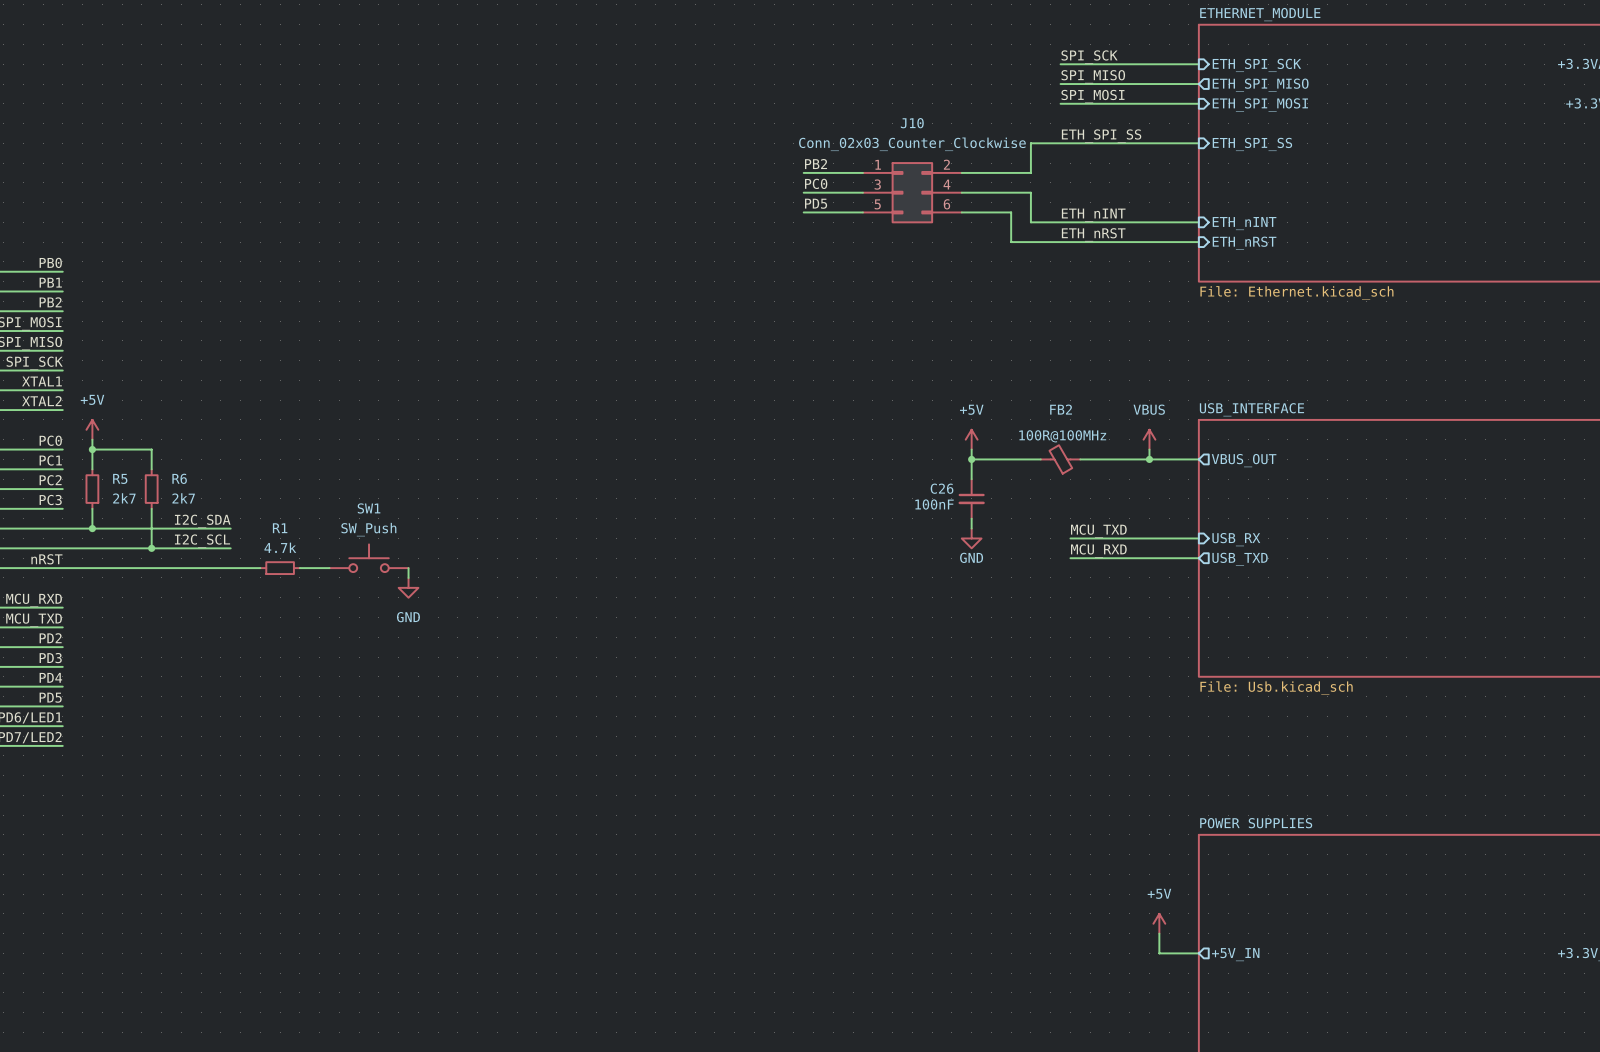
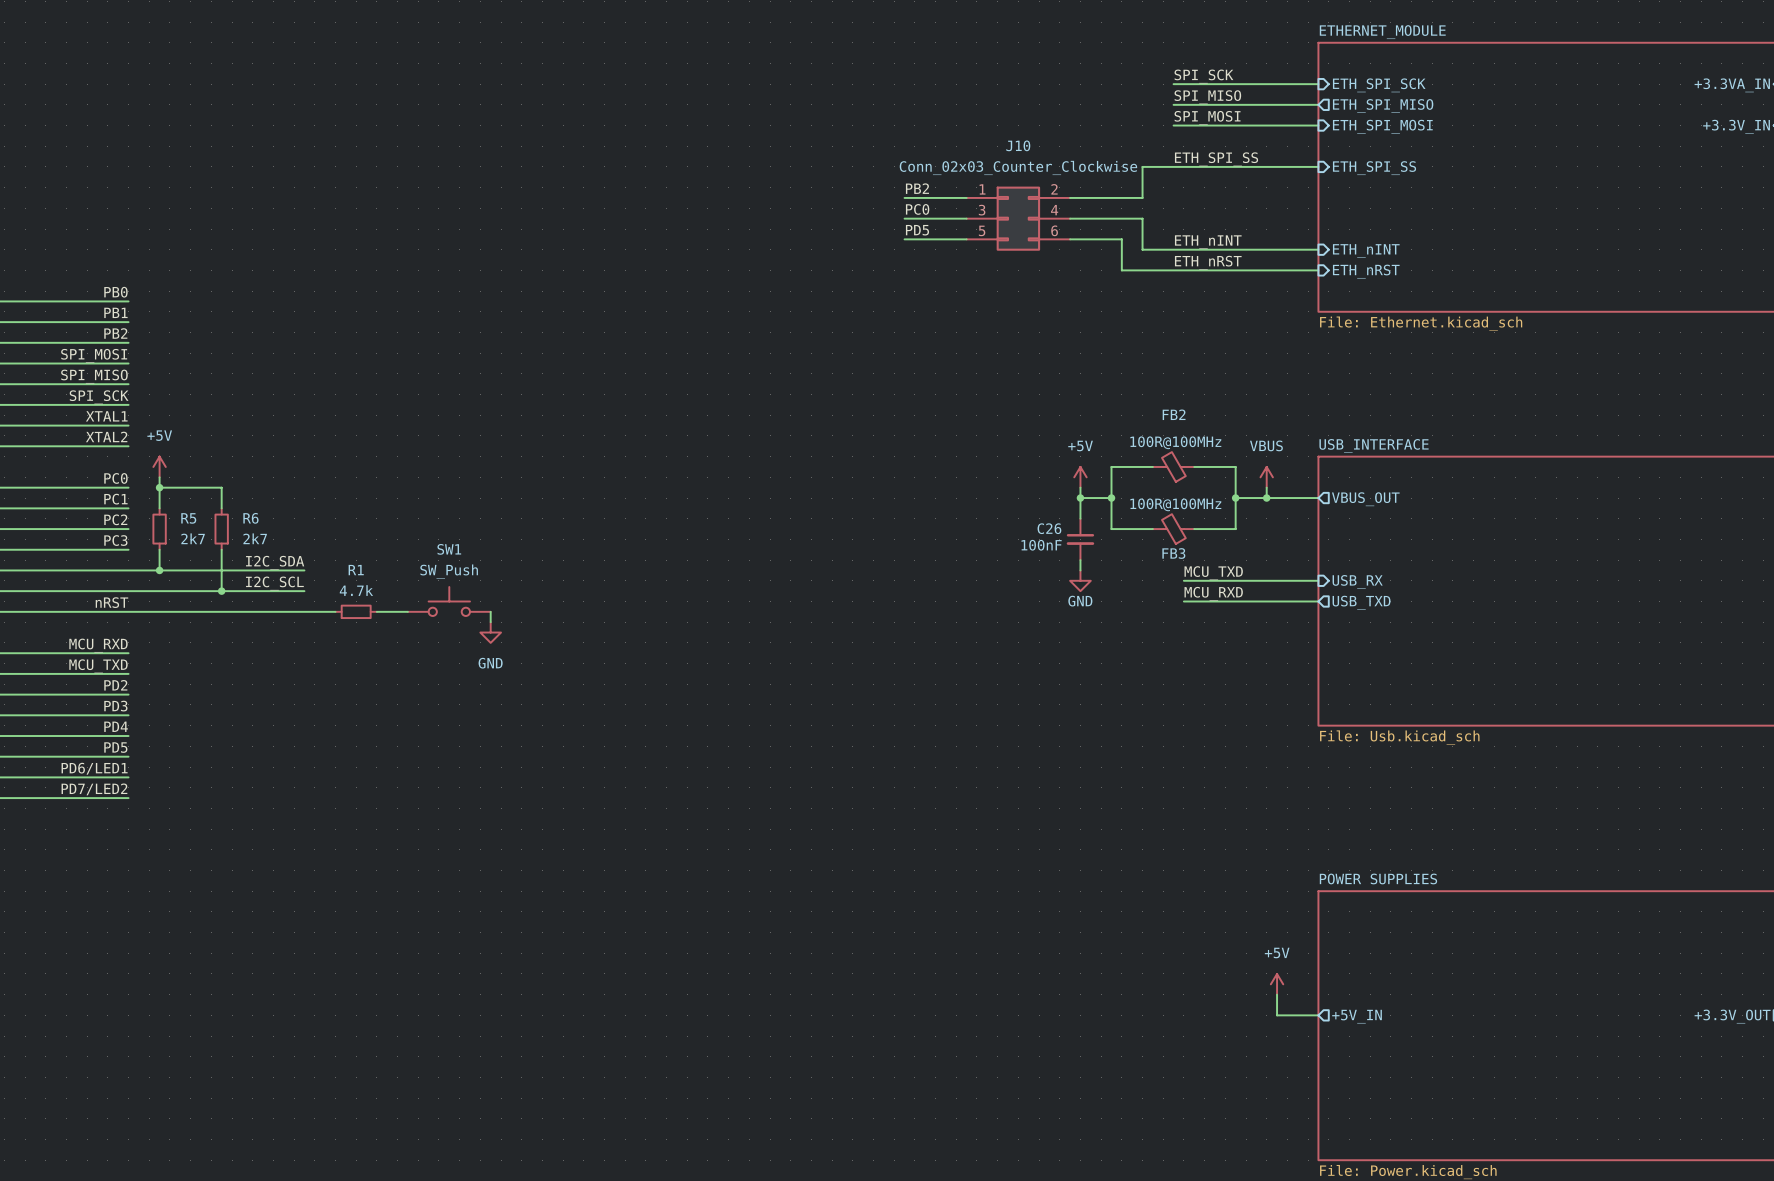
wire: none -> (1152, 466) (1111, 466) (1111, 529) (1152, 529)
wire: none -> (1194, 466) (1235, 466) (1235, 529) (1194, 529)
wire: (1001, 459) (1040, 459) -> none
junction: none -> (1111, 498)
FB2 position: (1060, 459) -> (1173, 466)
wire: (1080, 459) (1119, 459) -> none
junction: none -> (1235, 498)
FB3: none -> 100R@100MHz (1173, 529)

